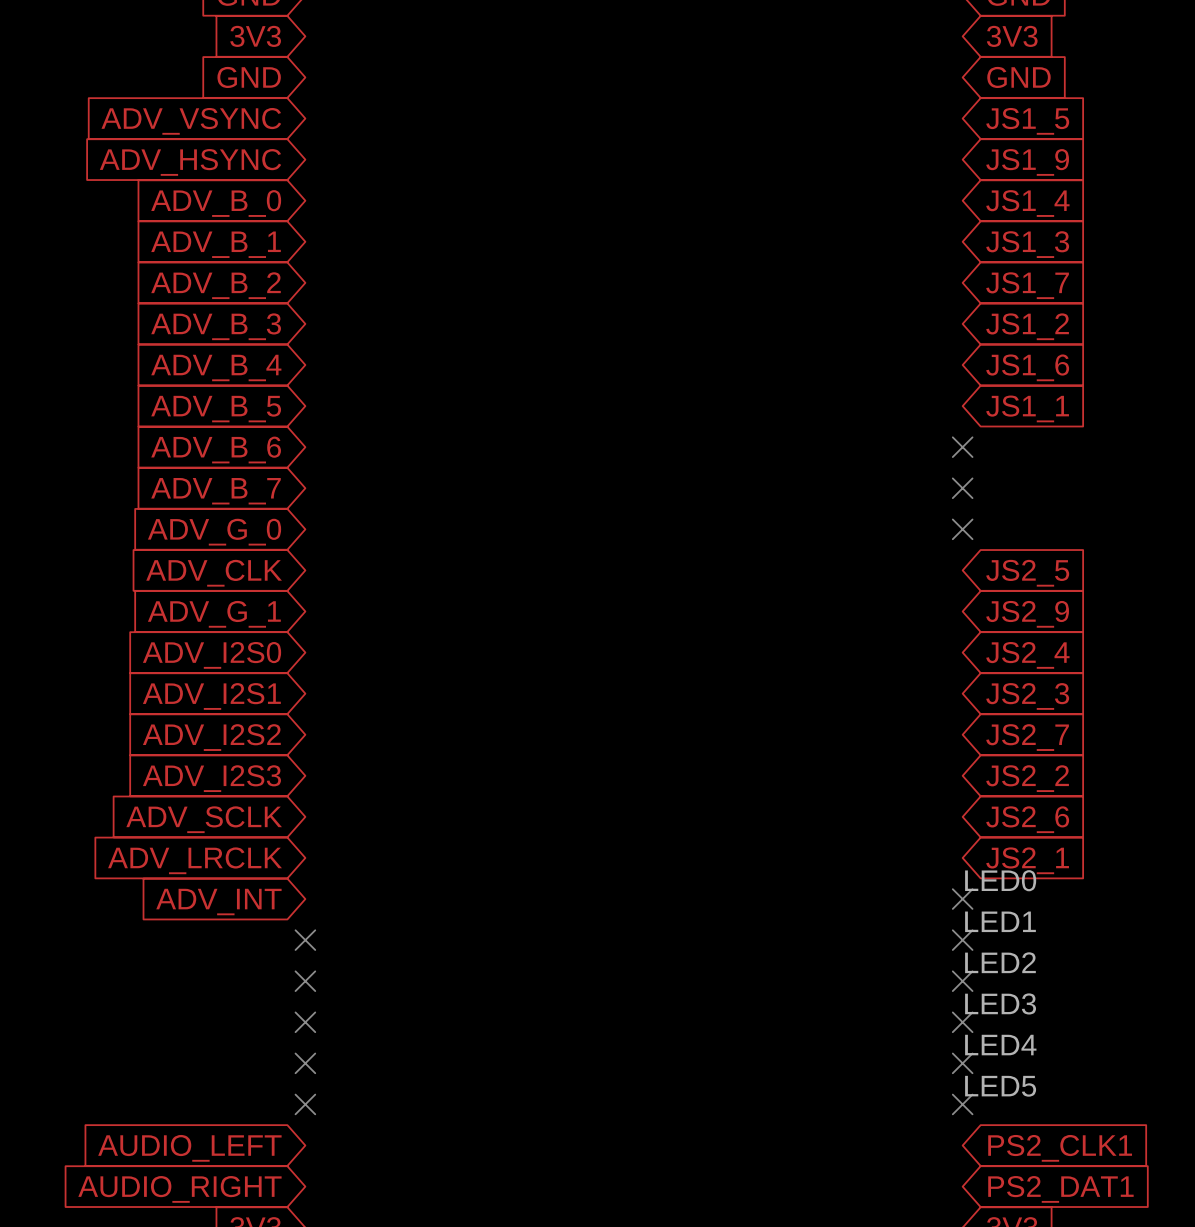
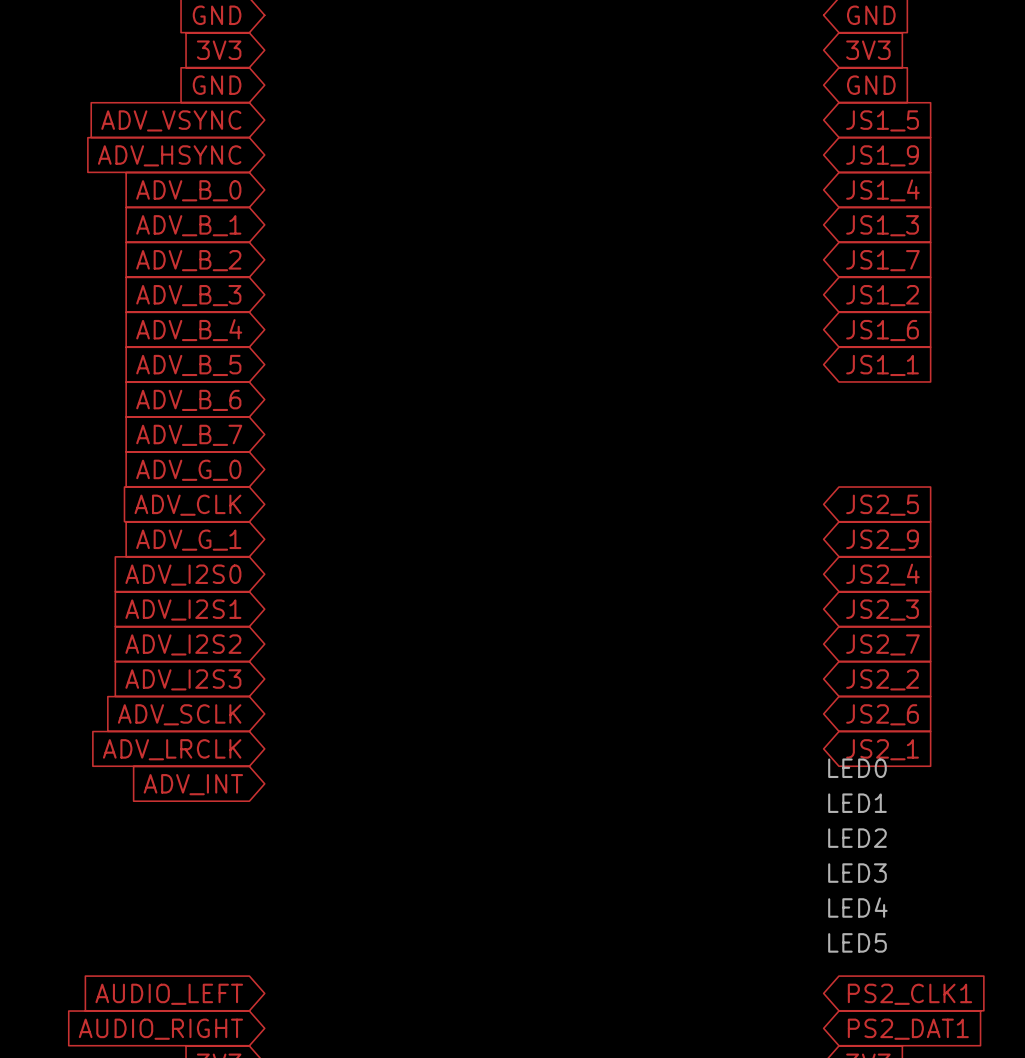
no-connect mark: (962, 447) -> none
no-connect mark: (962, 488) -> none
no-connect mark: (962, 529) -> none
no-connect mark: (962, 899) -> none
no-connect mark: (305, 940) -> none
no-connect mark: (962, 940) -> none
no-connect mark: (305, 981) -> none
no-connect mark: (962, 981) -> none
no-connect mark: (305, 1022) -> none
no-connect mark: (962, 1022) -> none
no-connect mark: (305, 1063) -> none
no-connect mark: (962, 1063) -> none
no-connect mark: (305, 1104) -> none
no-connect mark: (962, 1104) -> none

